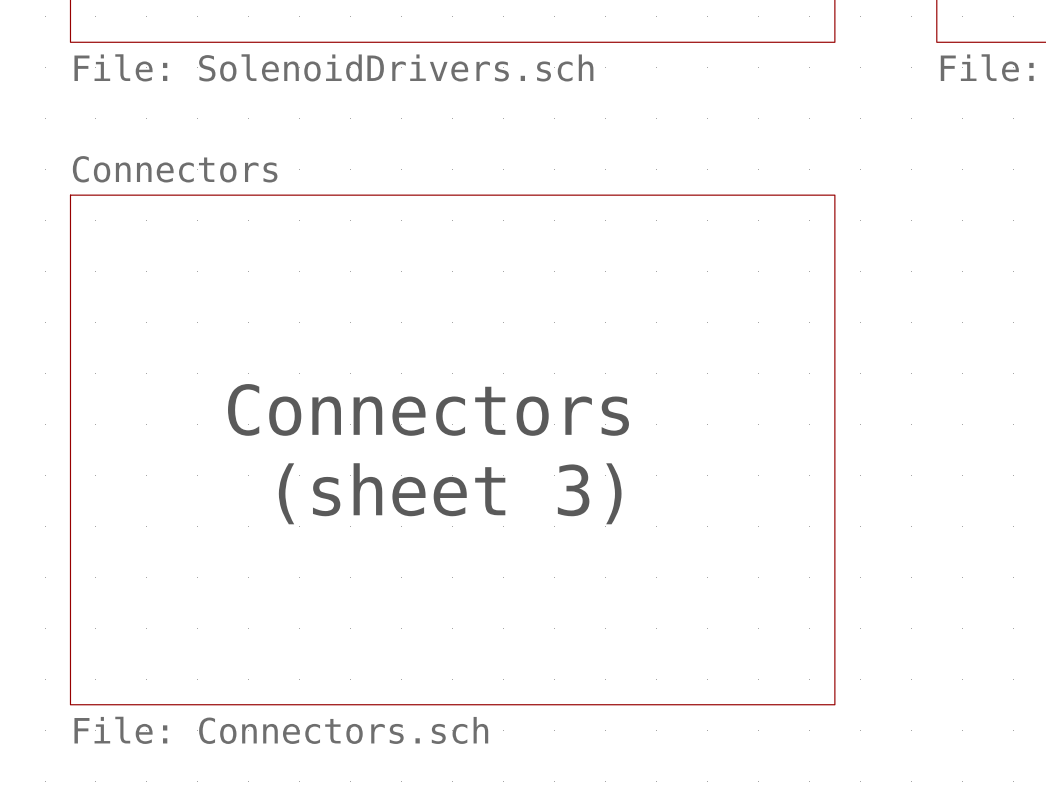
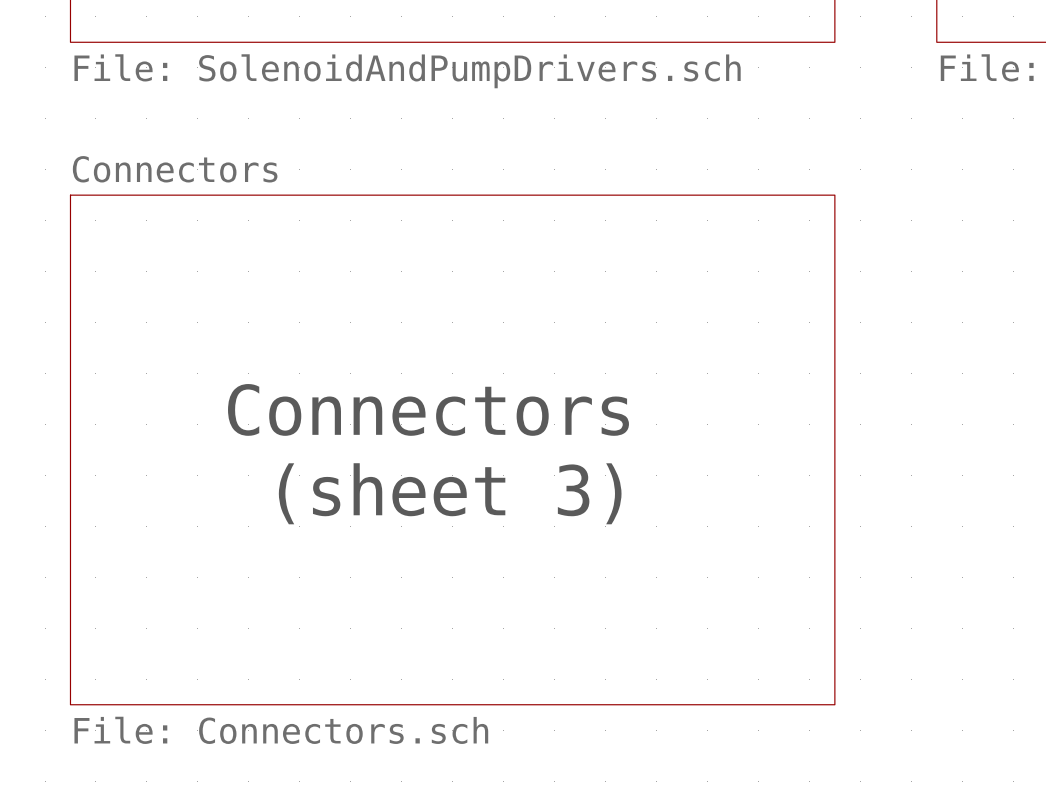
sheet value: File: SolenoidDrivers.sch (333, 67) -> File: SolenoidAndPumpDrivers.sch (407, 71)

